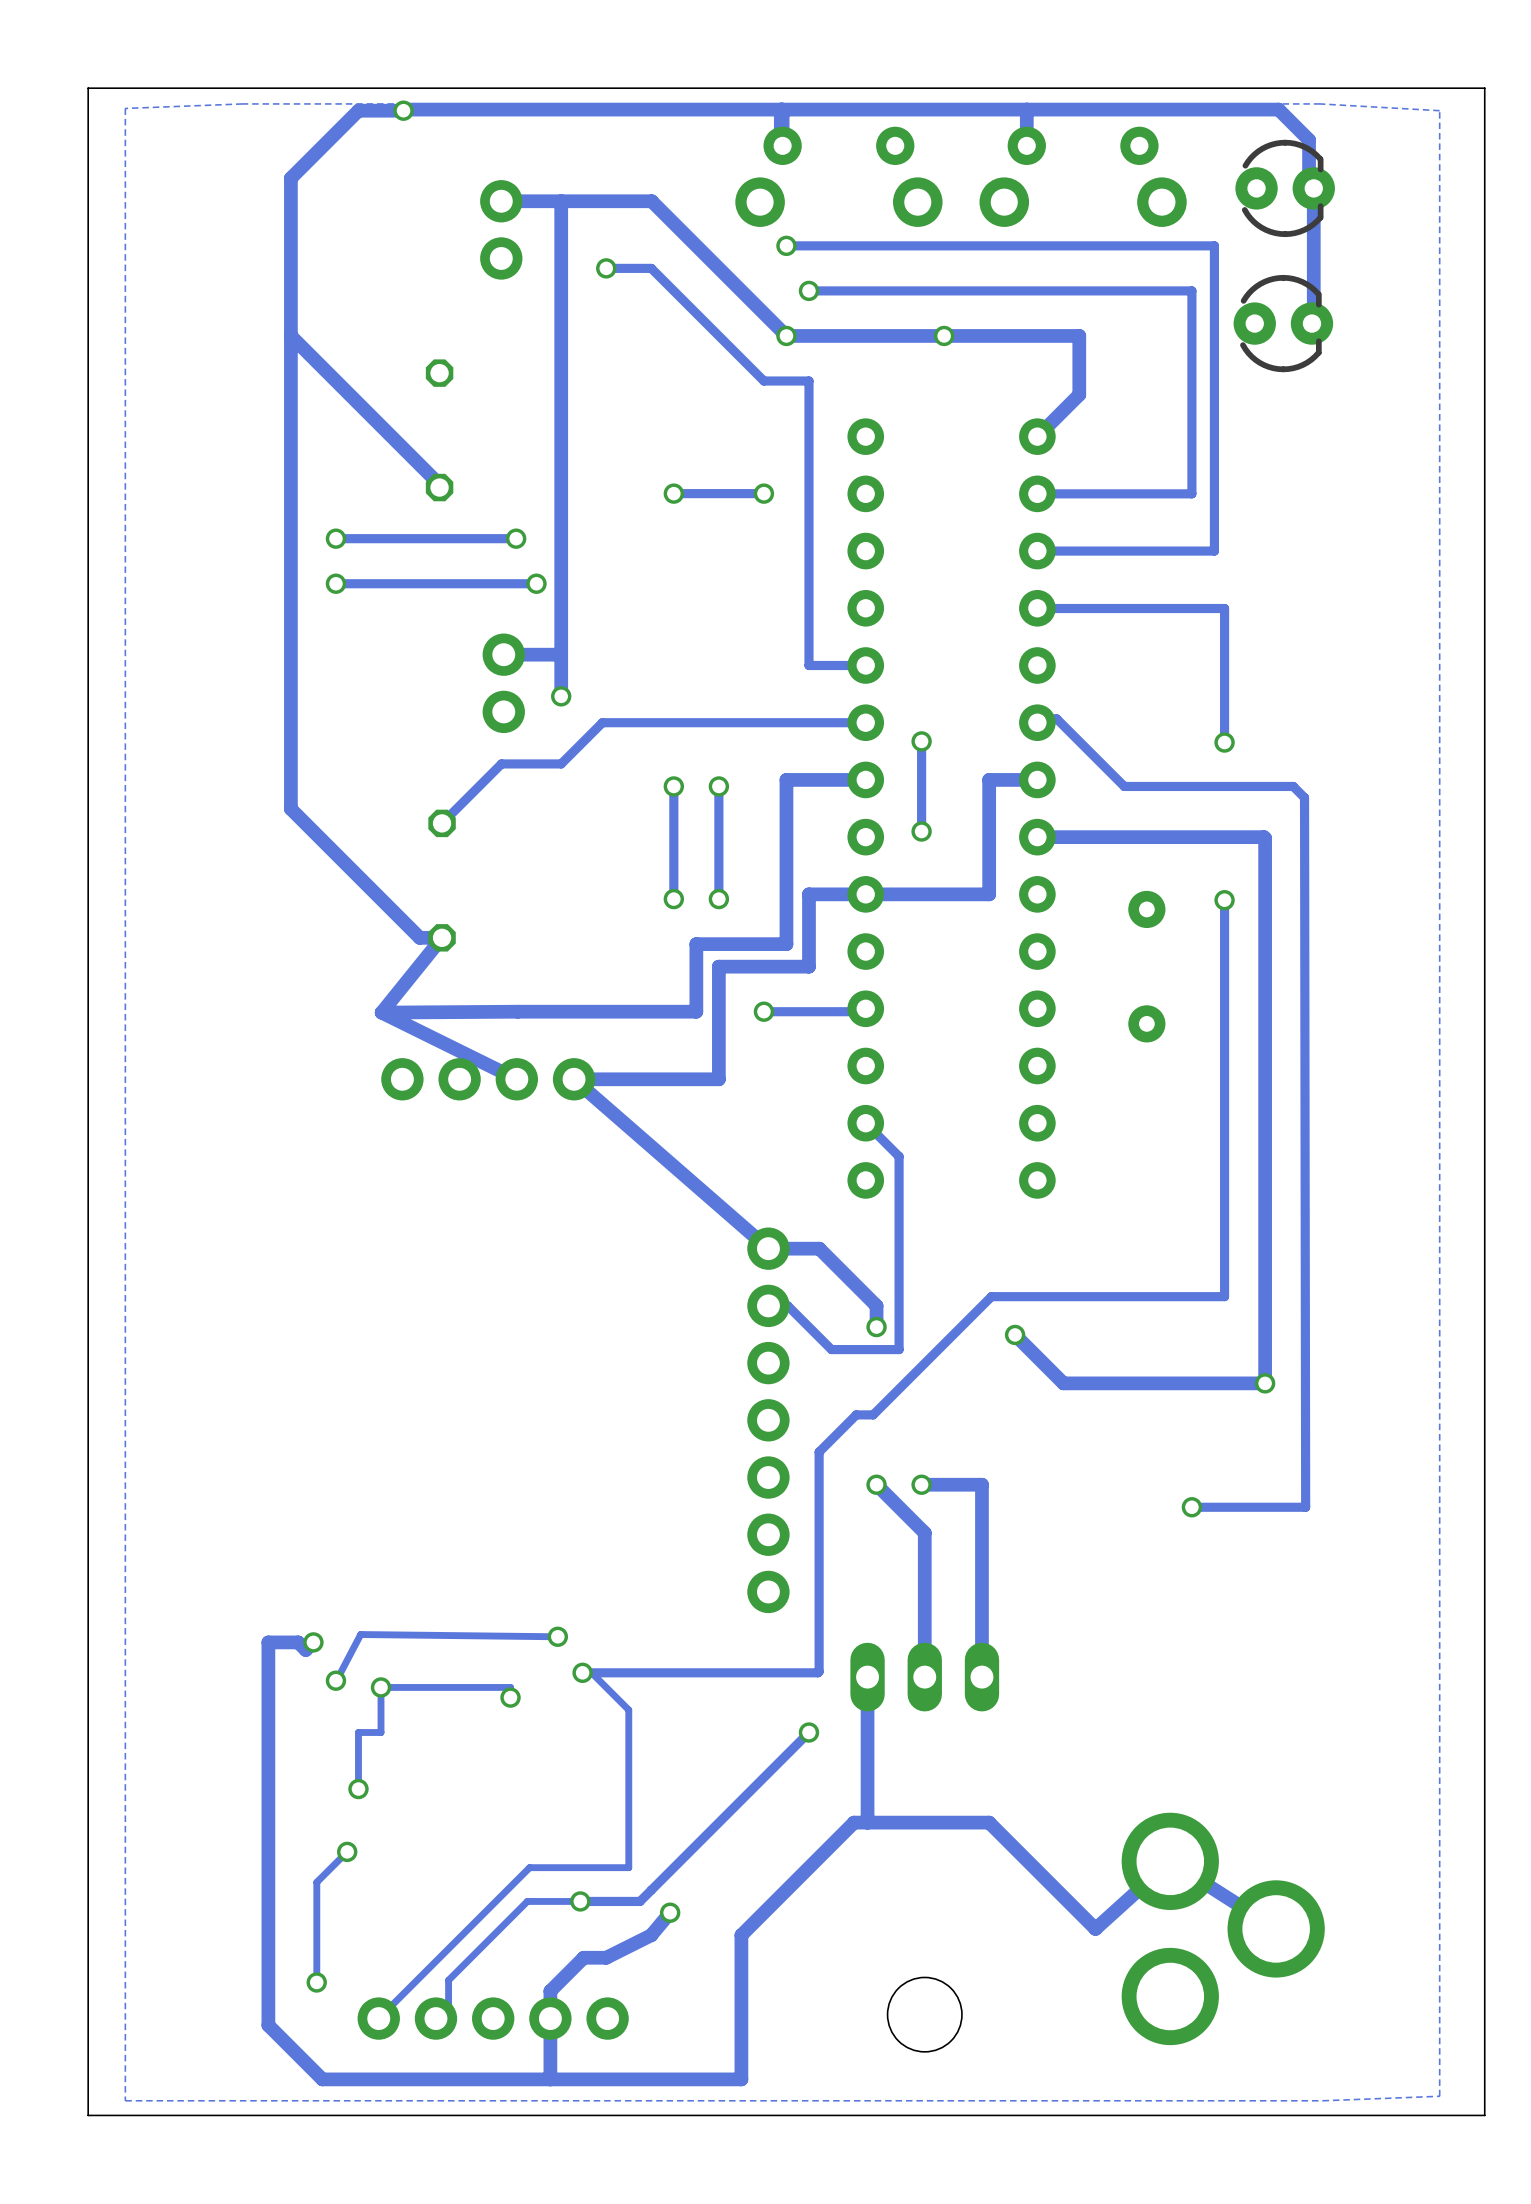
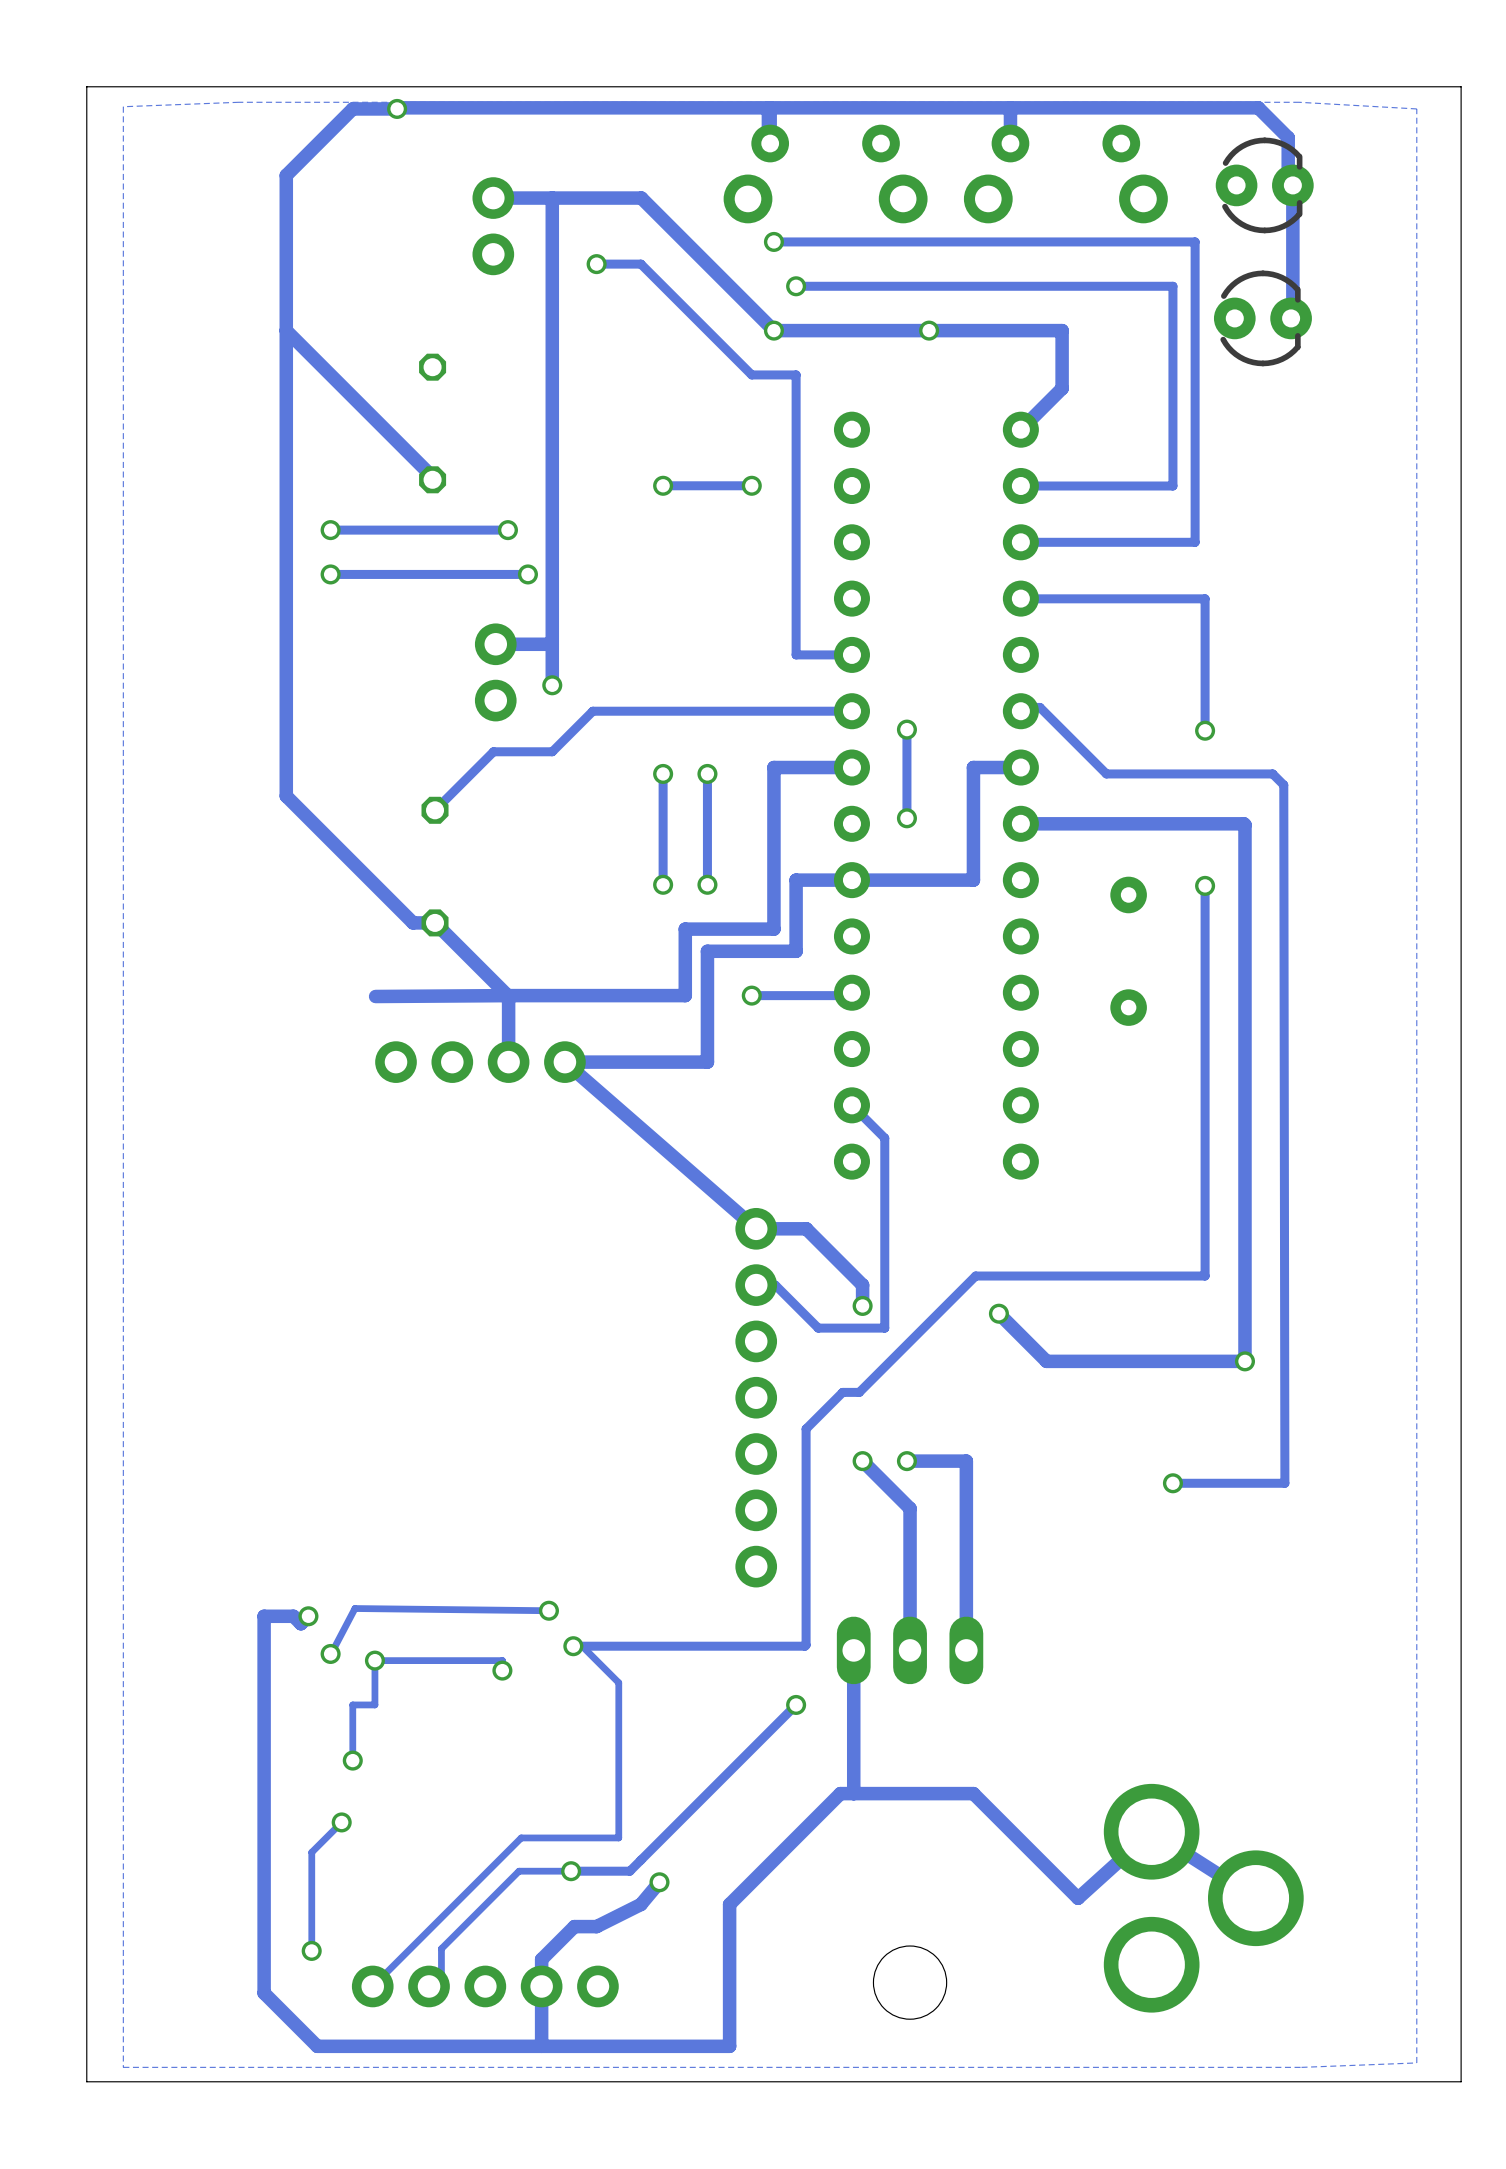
track: (442, 937) (381, 1012) (516, 1079) -> (435, 922) (508, 996) (508, 1062)

